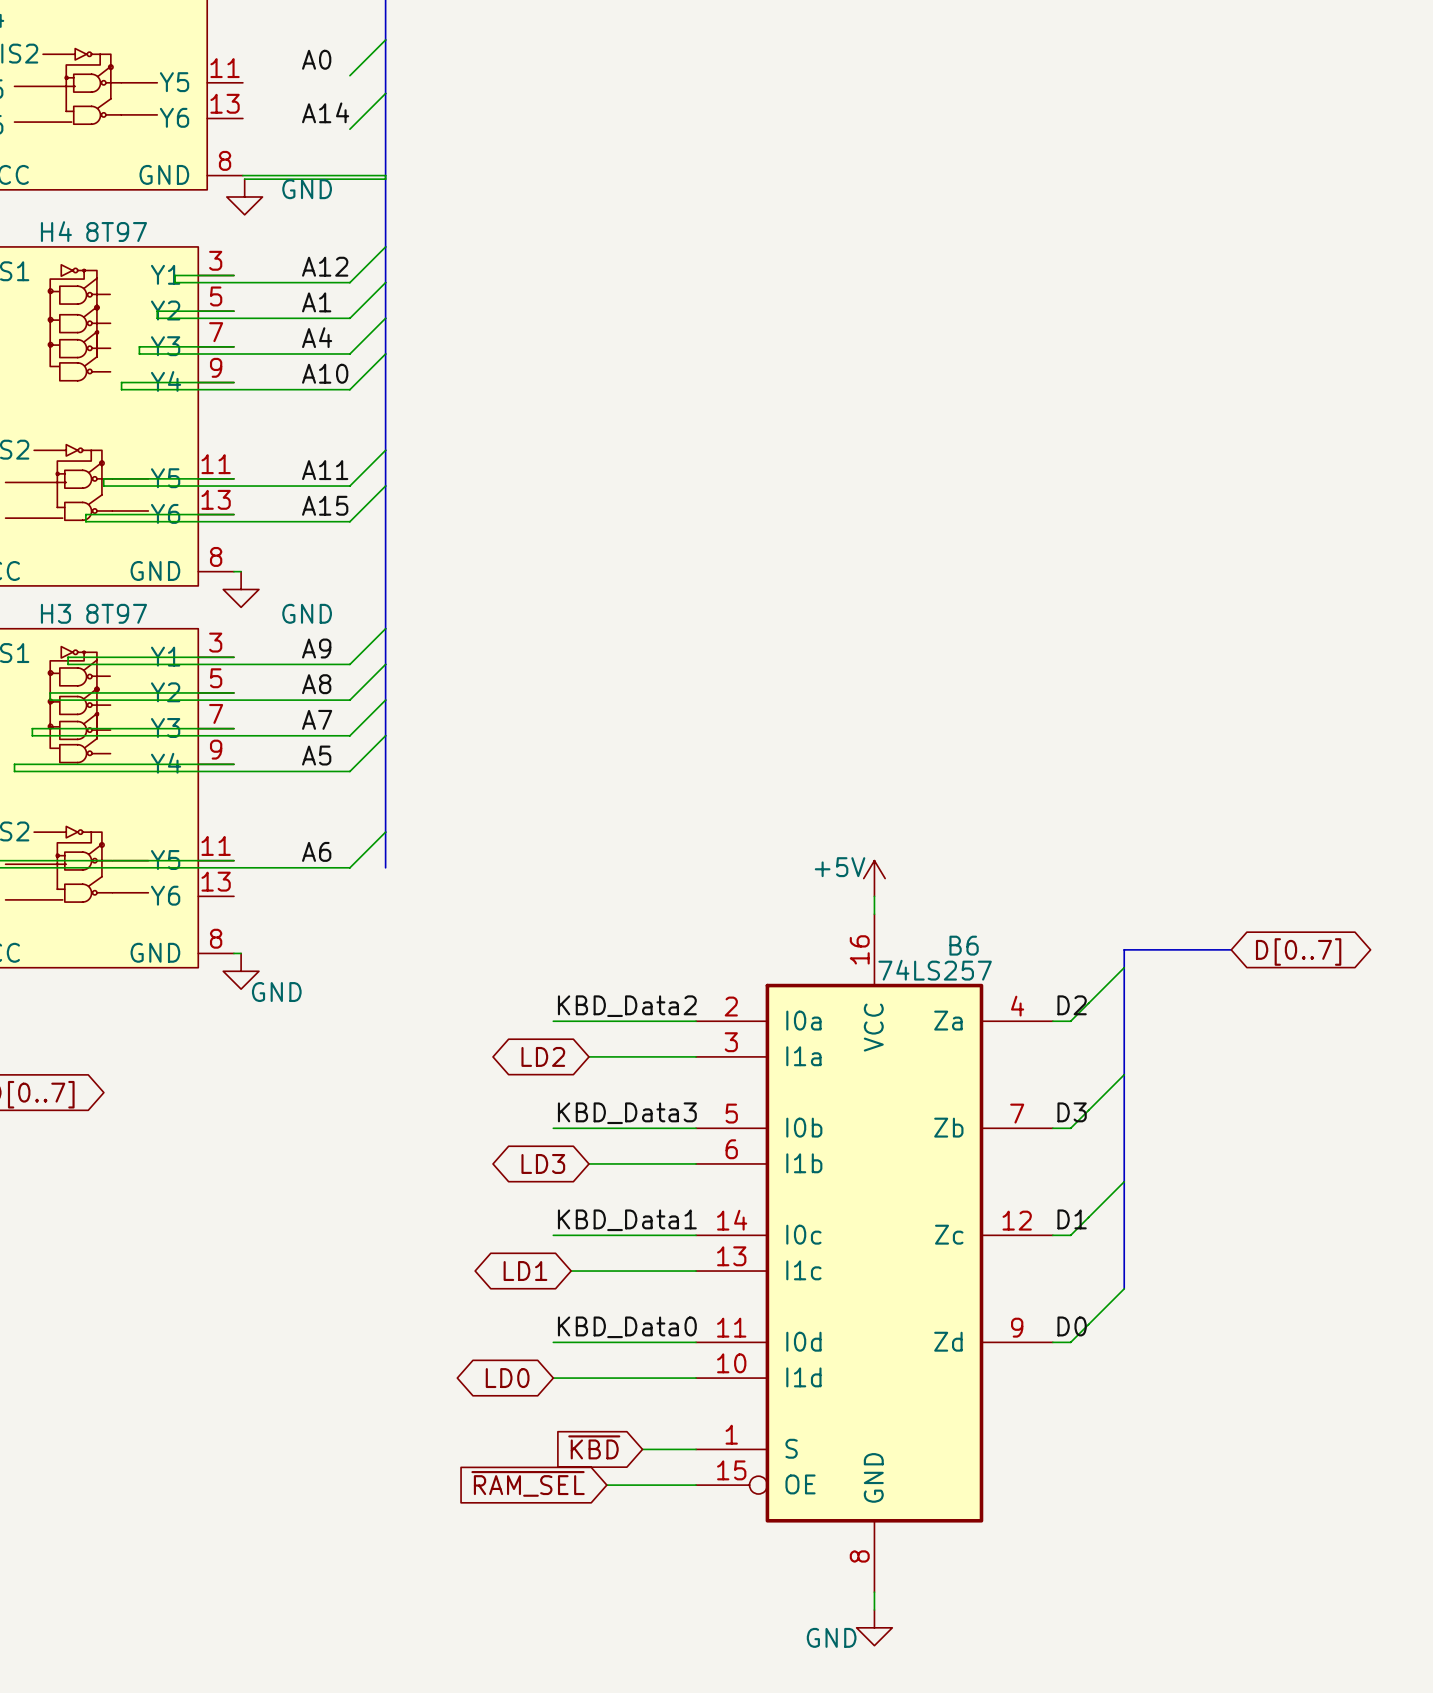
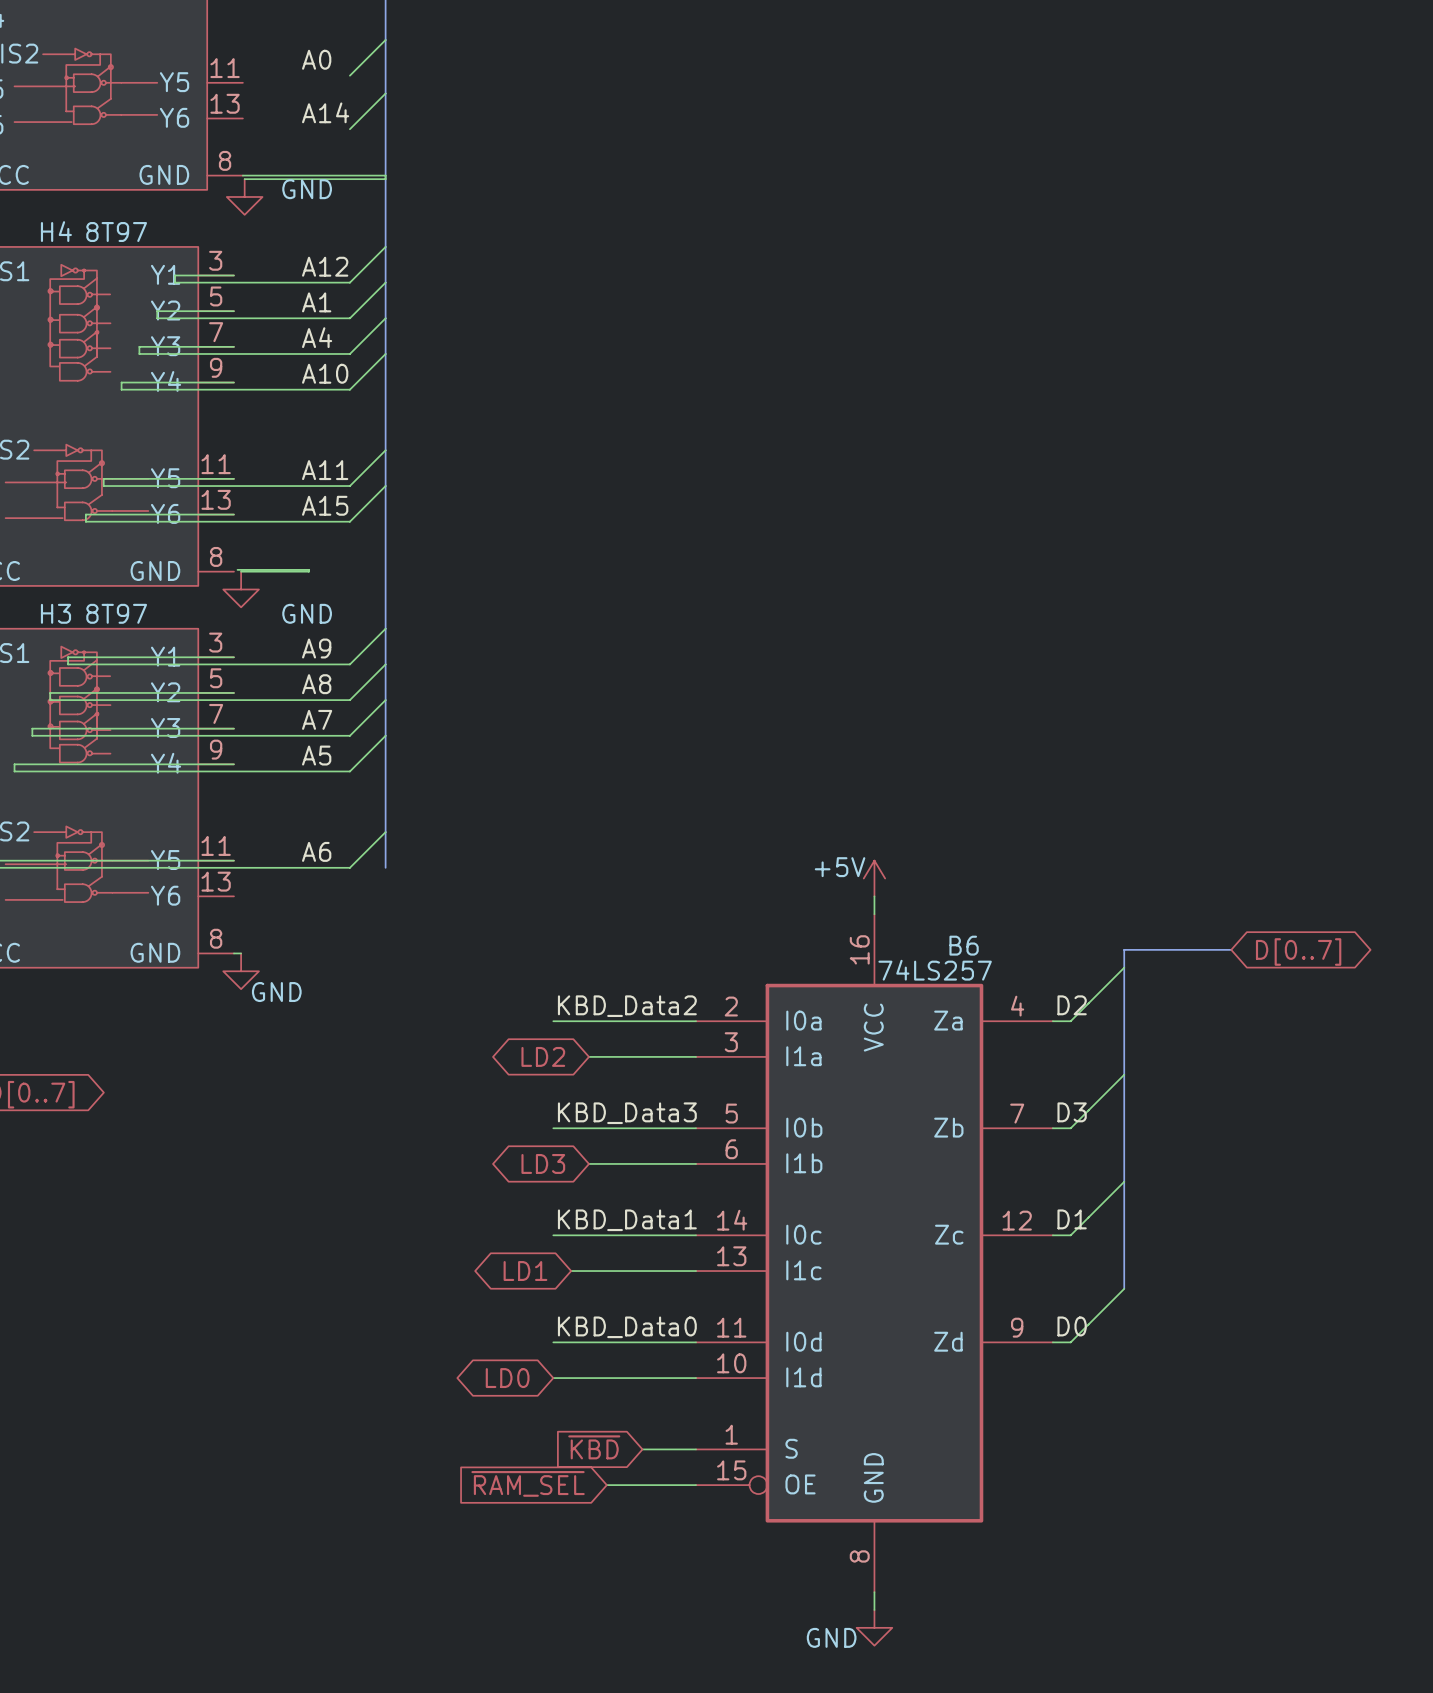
wire: (233, 571) (241, 571) -> (237, 569) (308, 569) (308, 571) (241, 571)

